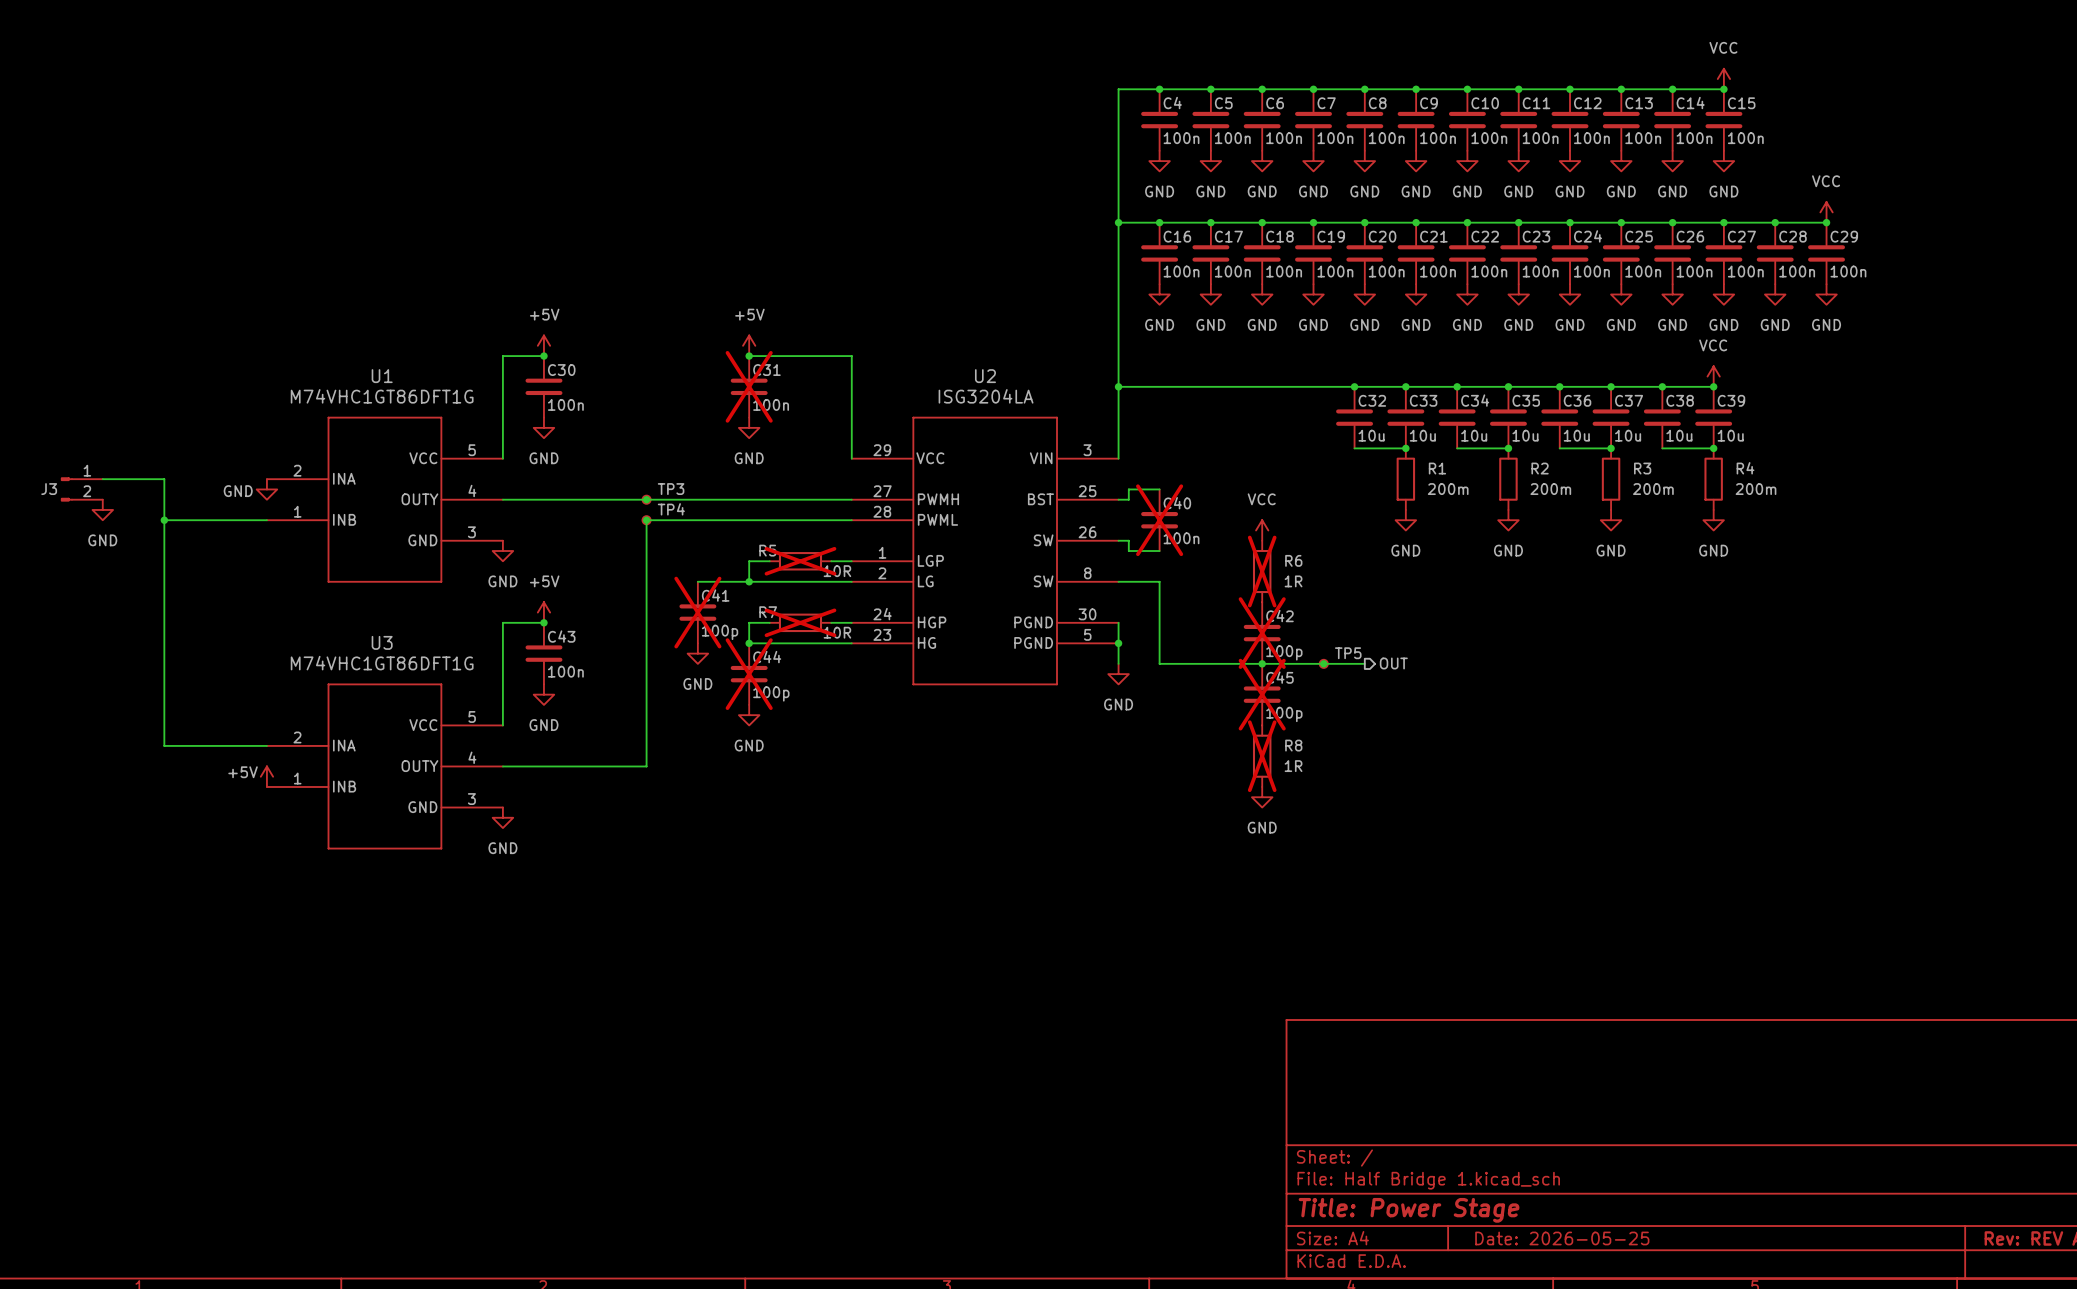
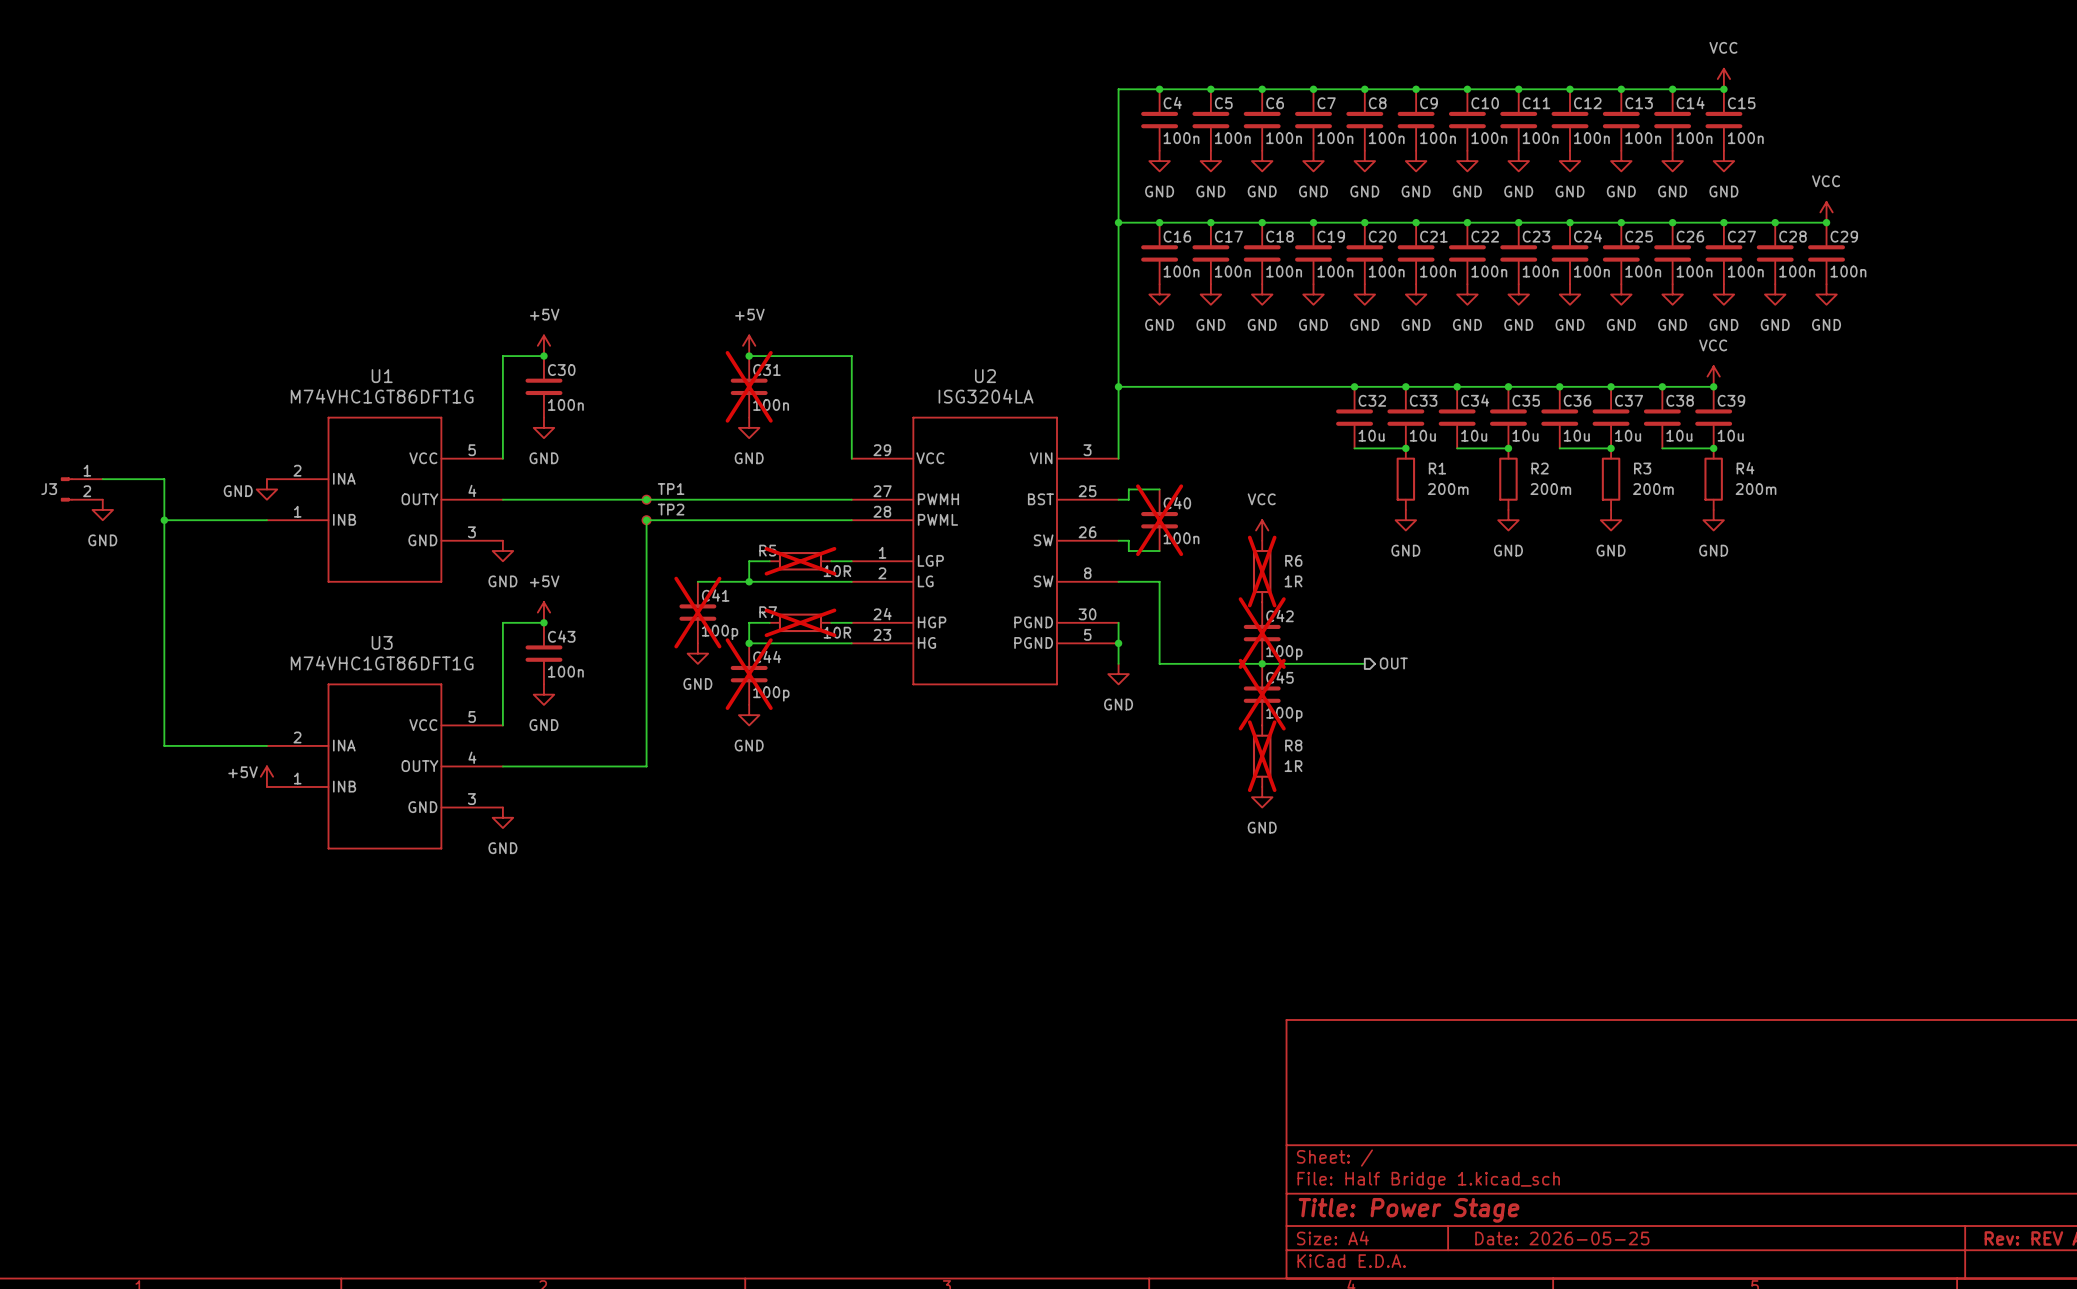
TP3 name: TP3 (671, 489) -> TP1 (671, 489)
TP4 name: TP4 (671, 509) -> TP2 (671, 509)
junction: (1323, 663) -> none
TP5: (1323, 663) -> none

